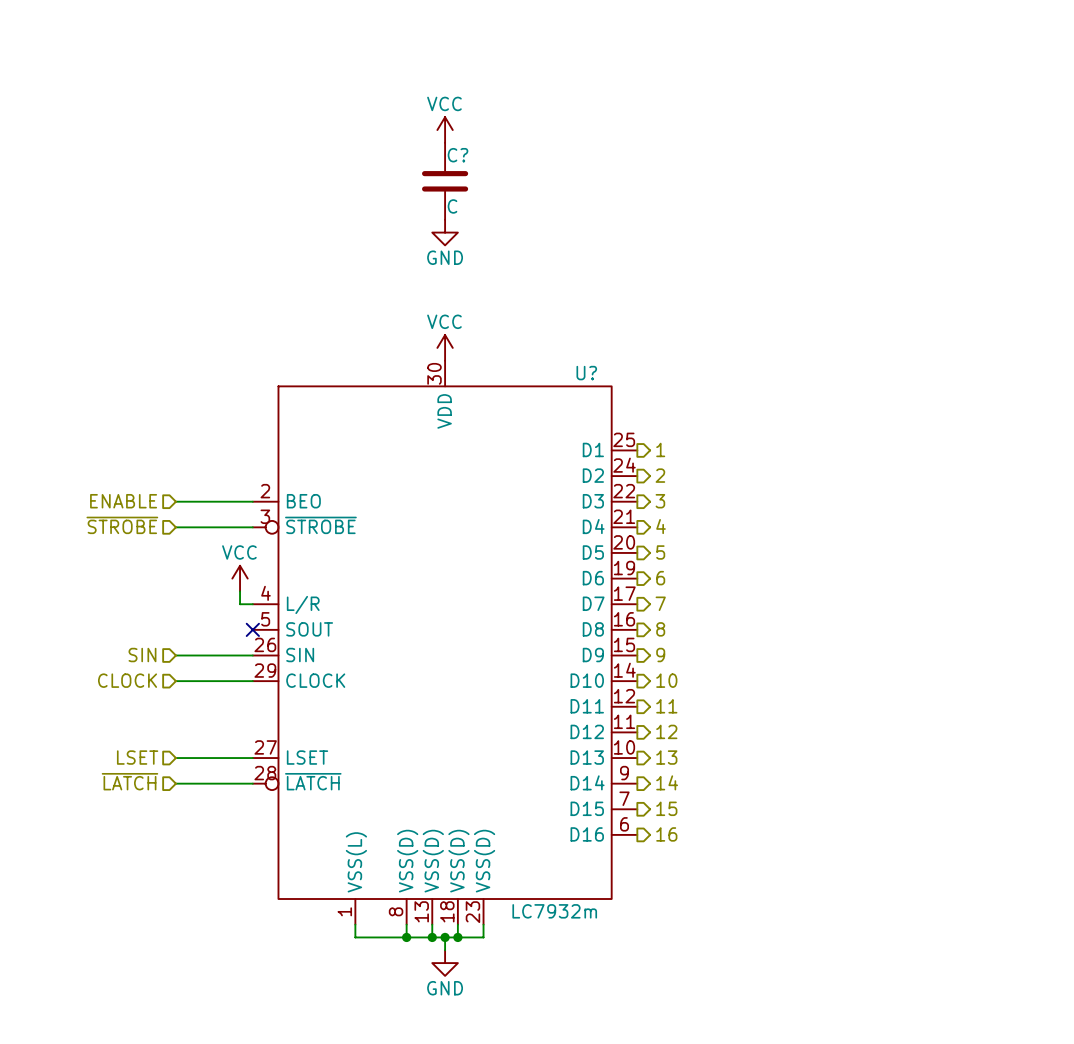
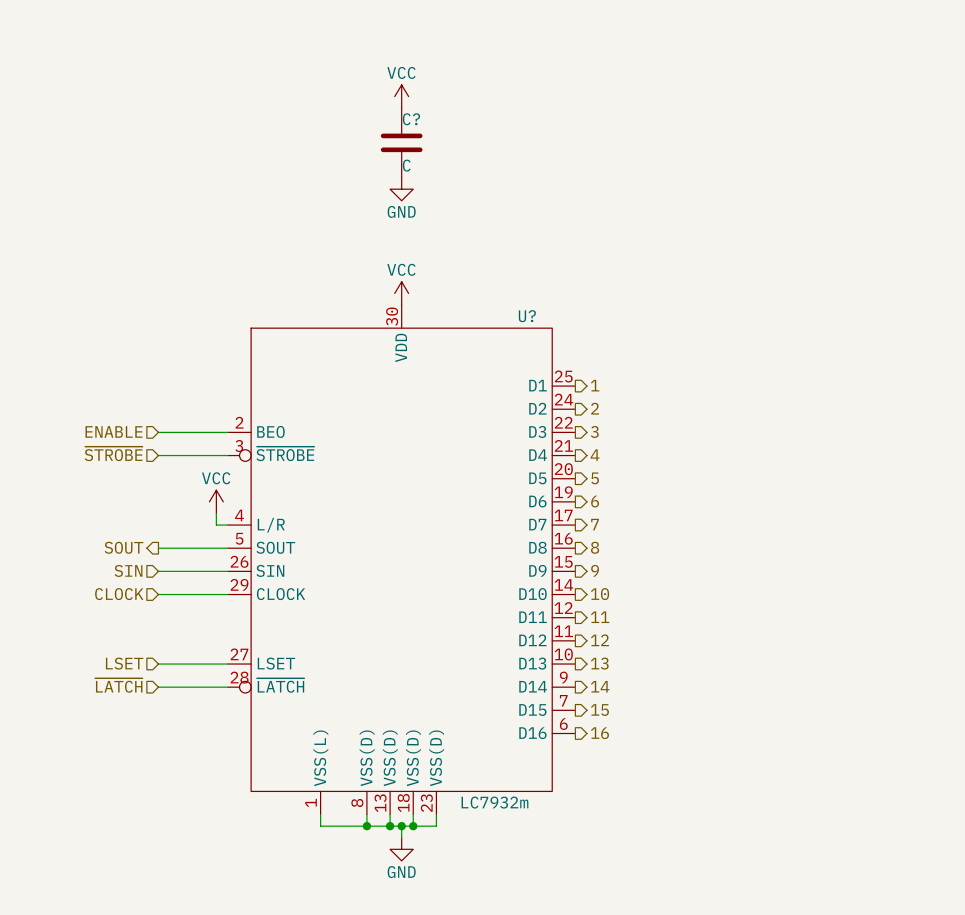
hierarchical label: none -> SOUT (124, 547)
wire: none -> (158, 548) (227, 548)
no-connect mark: (252, 629) -> none

